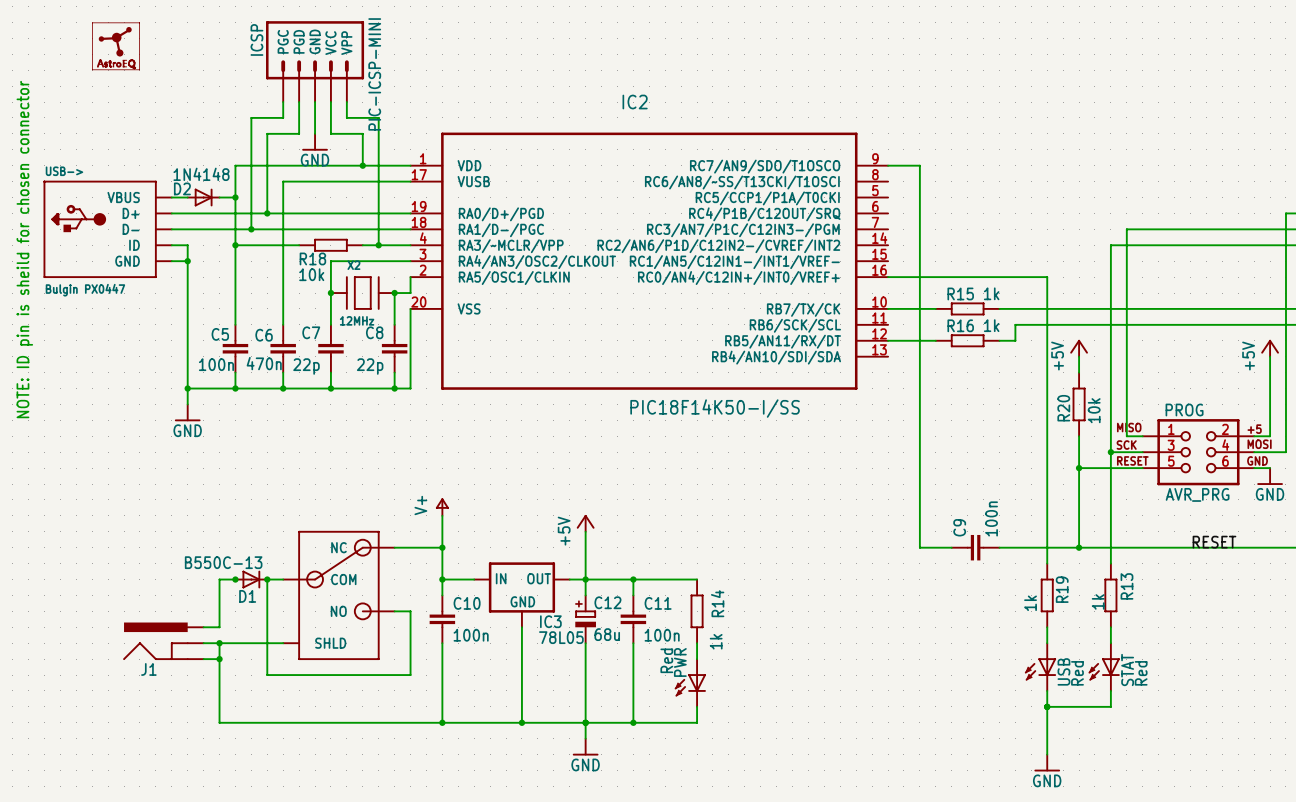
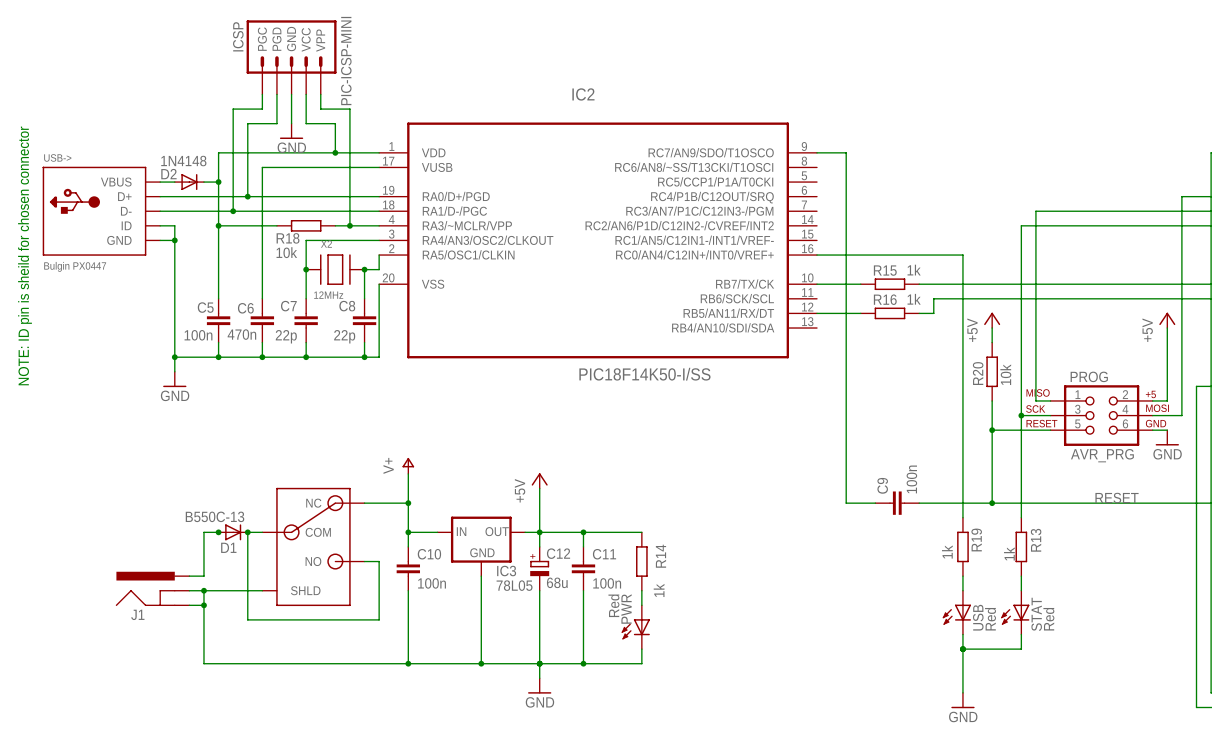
part: (116, 46) -> none

